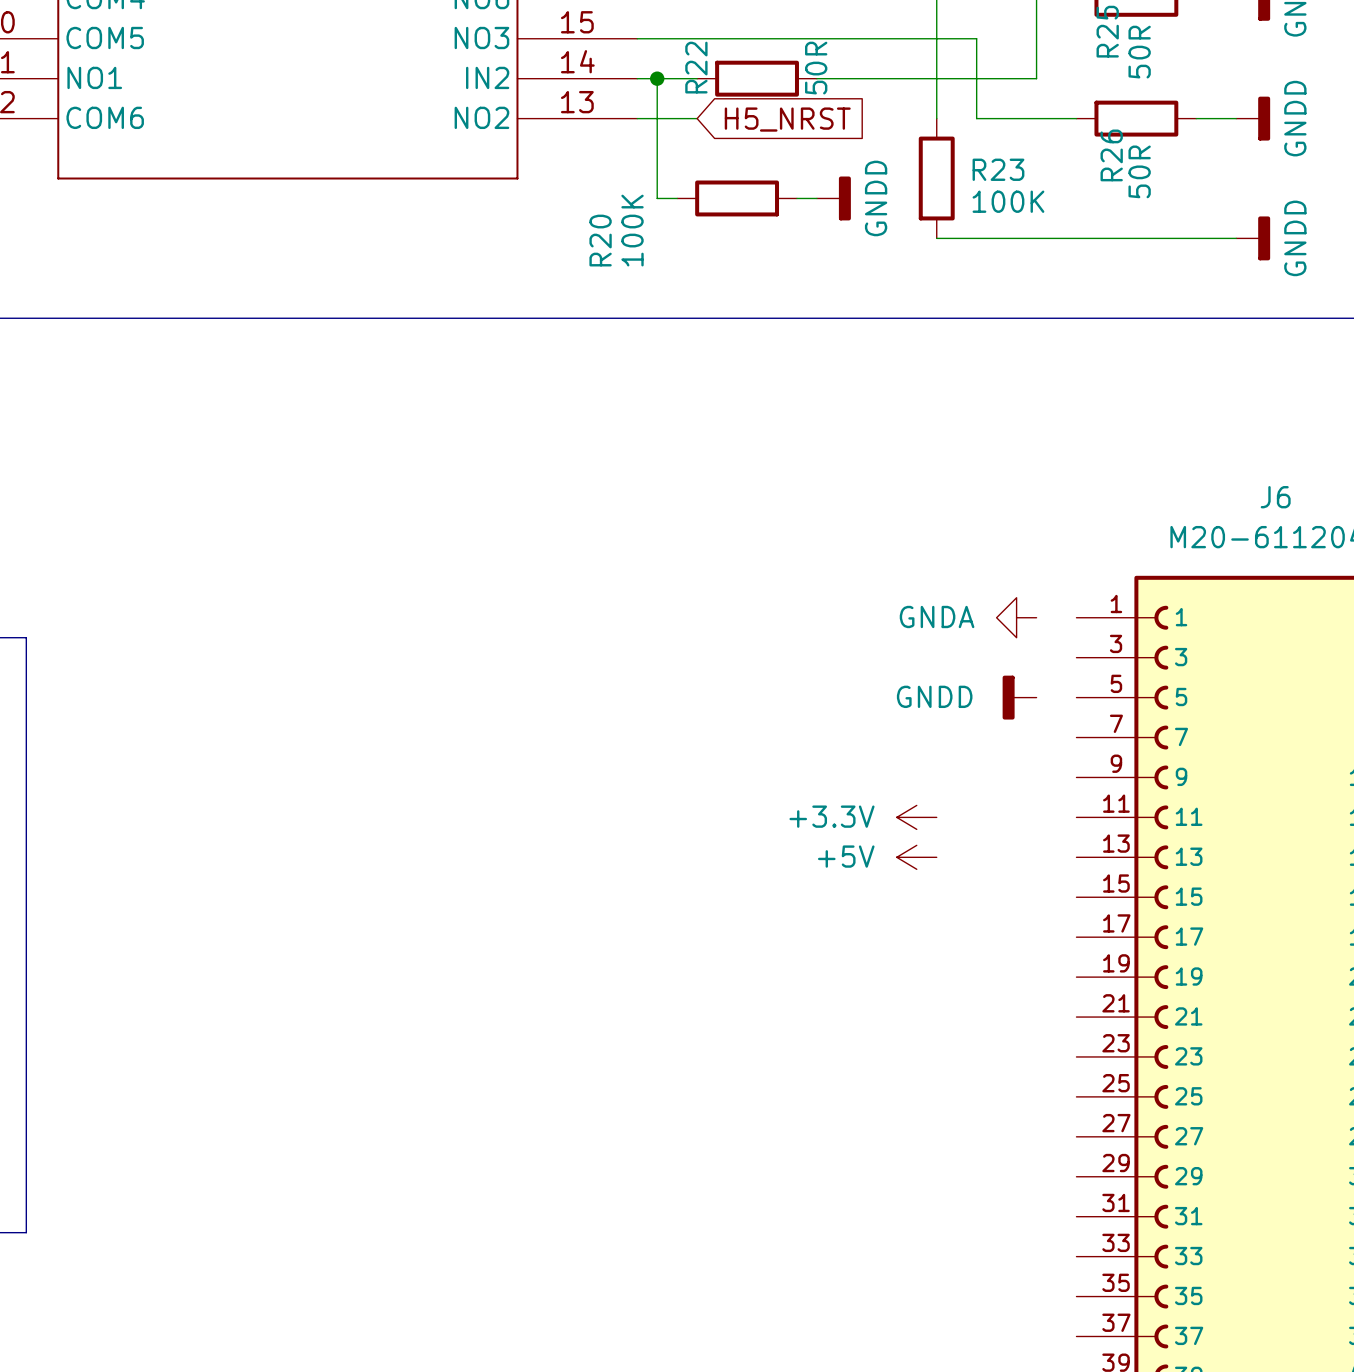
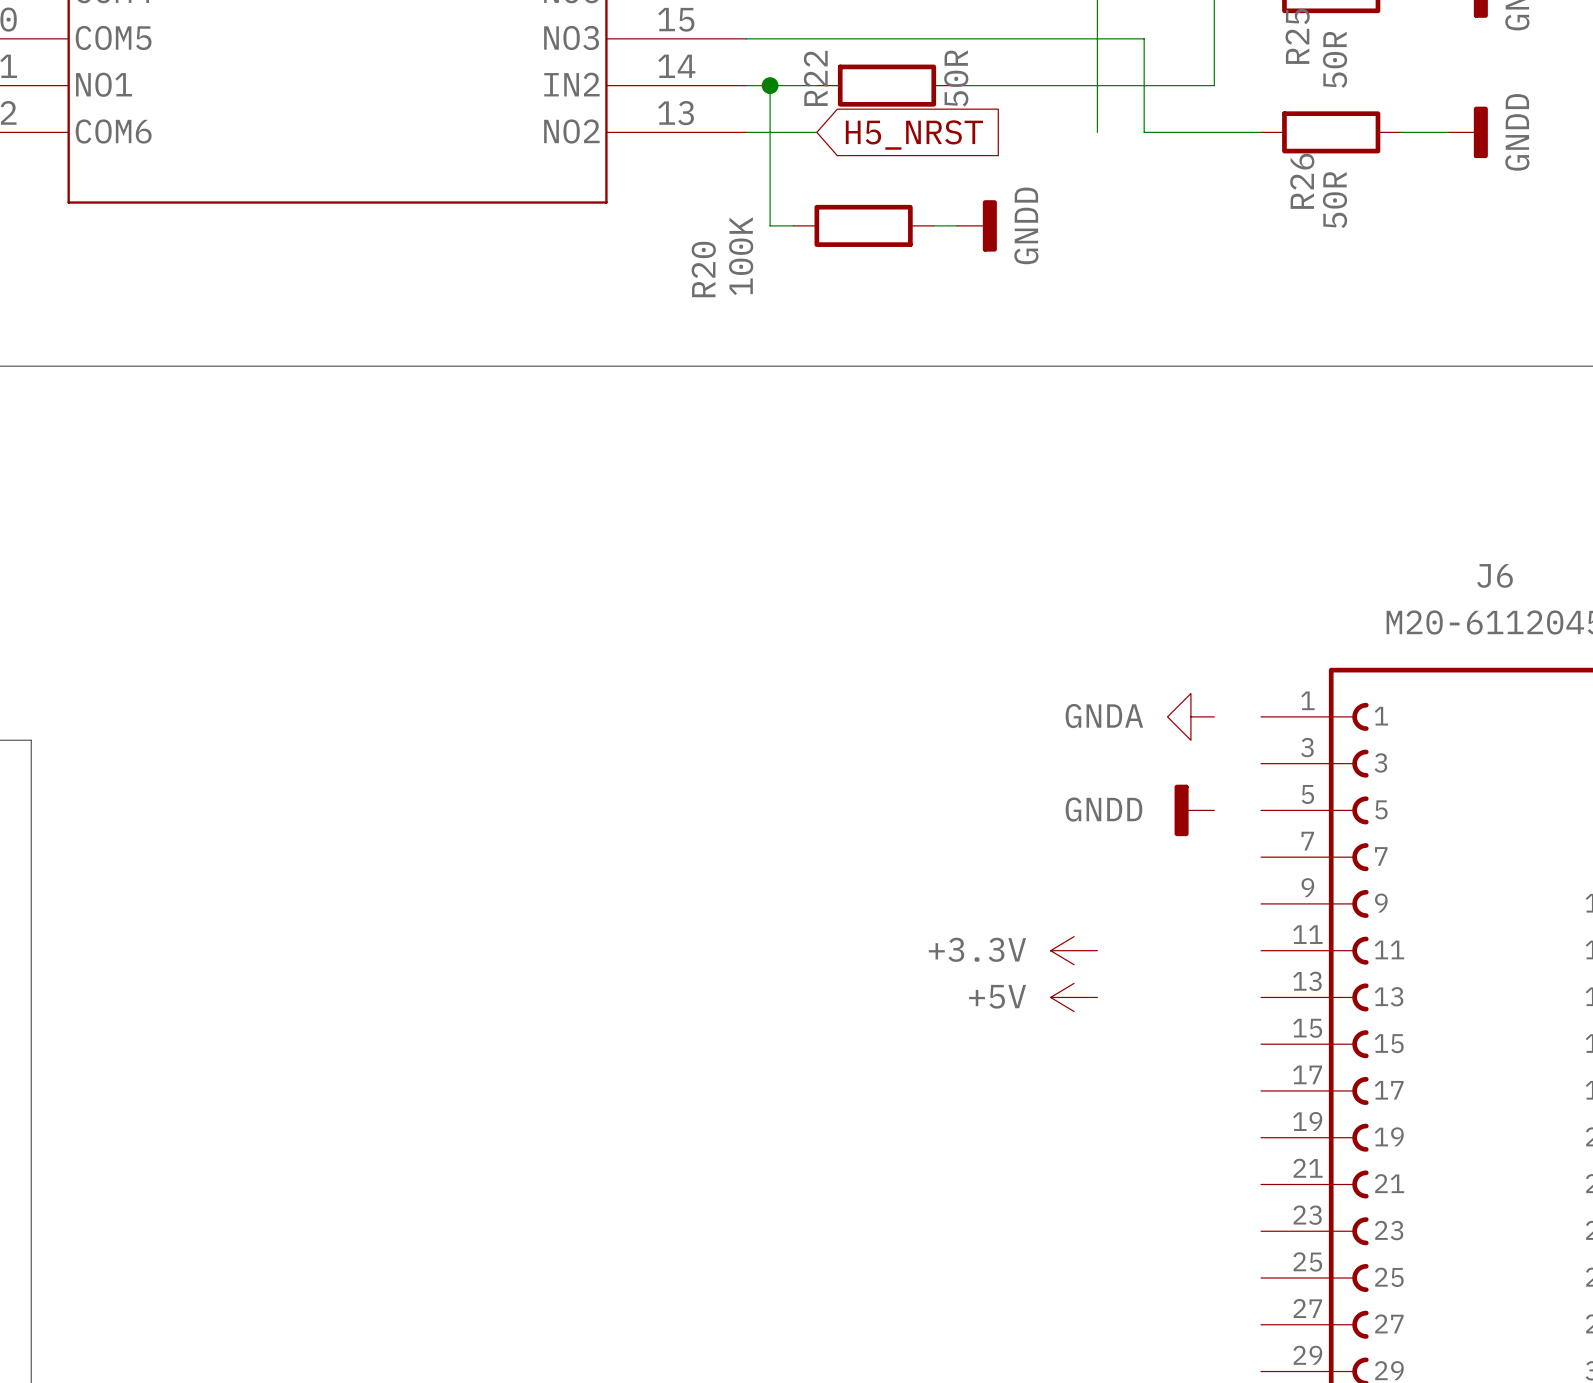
R23: 100K (936, 178) -> none
wire: (936, 238) (1236, 238) -> none
power symbol: GNDD (1253, 238) -> none

